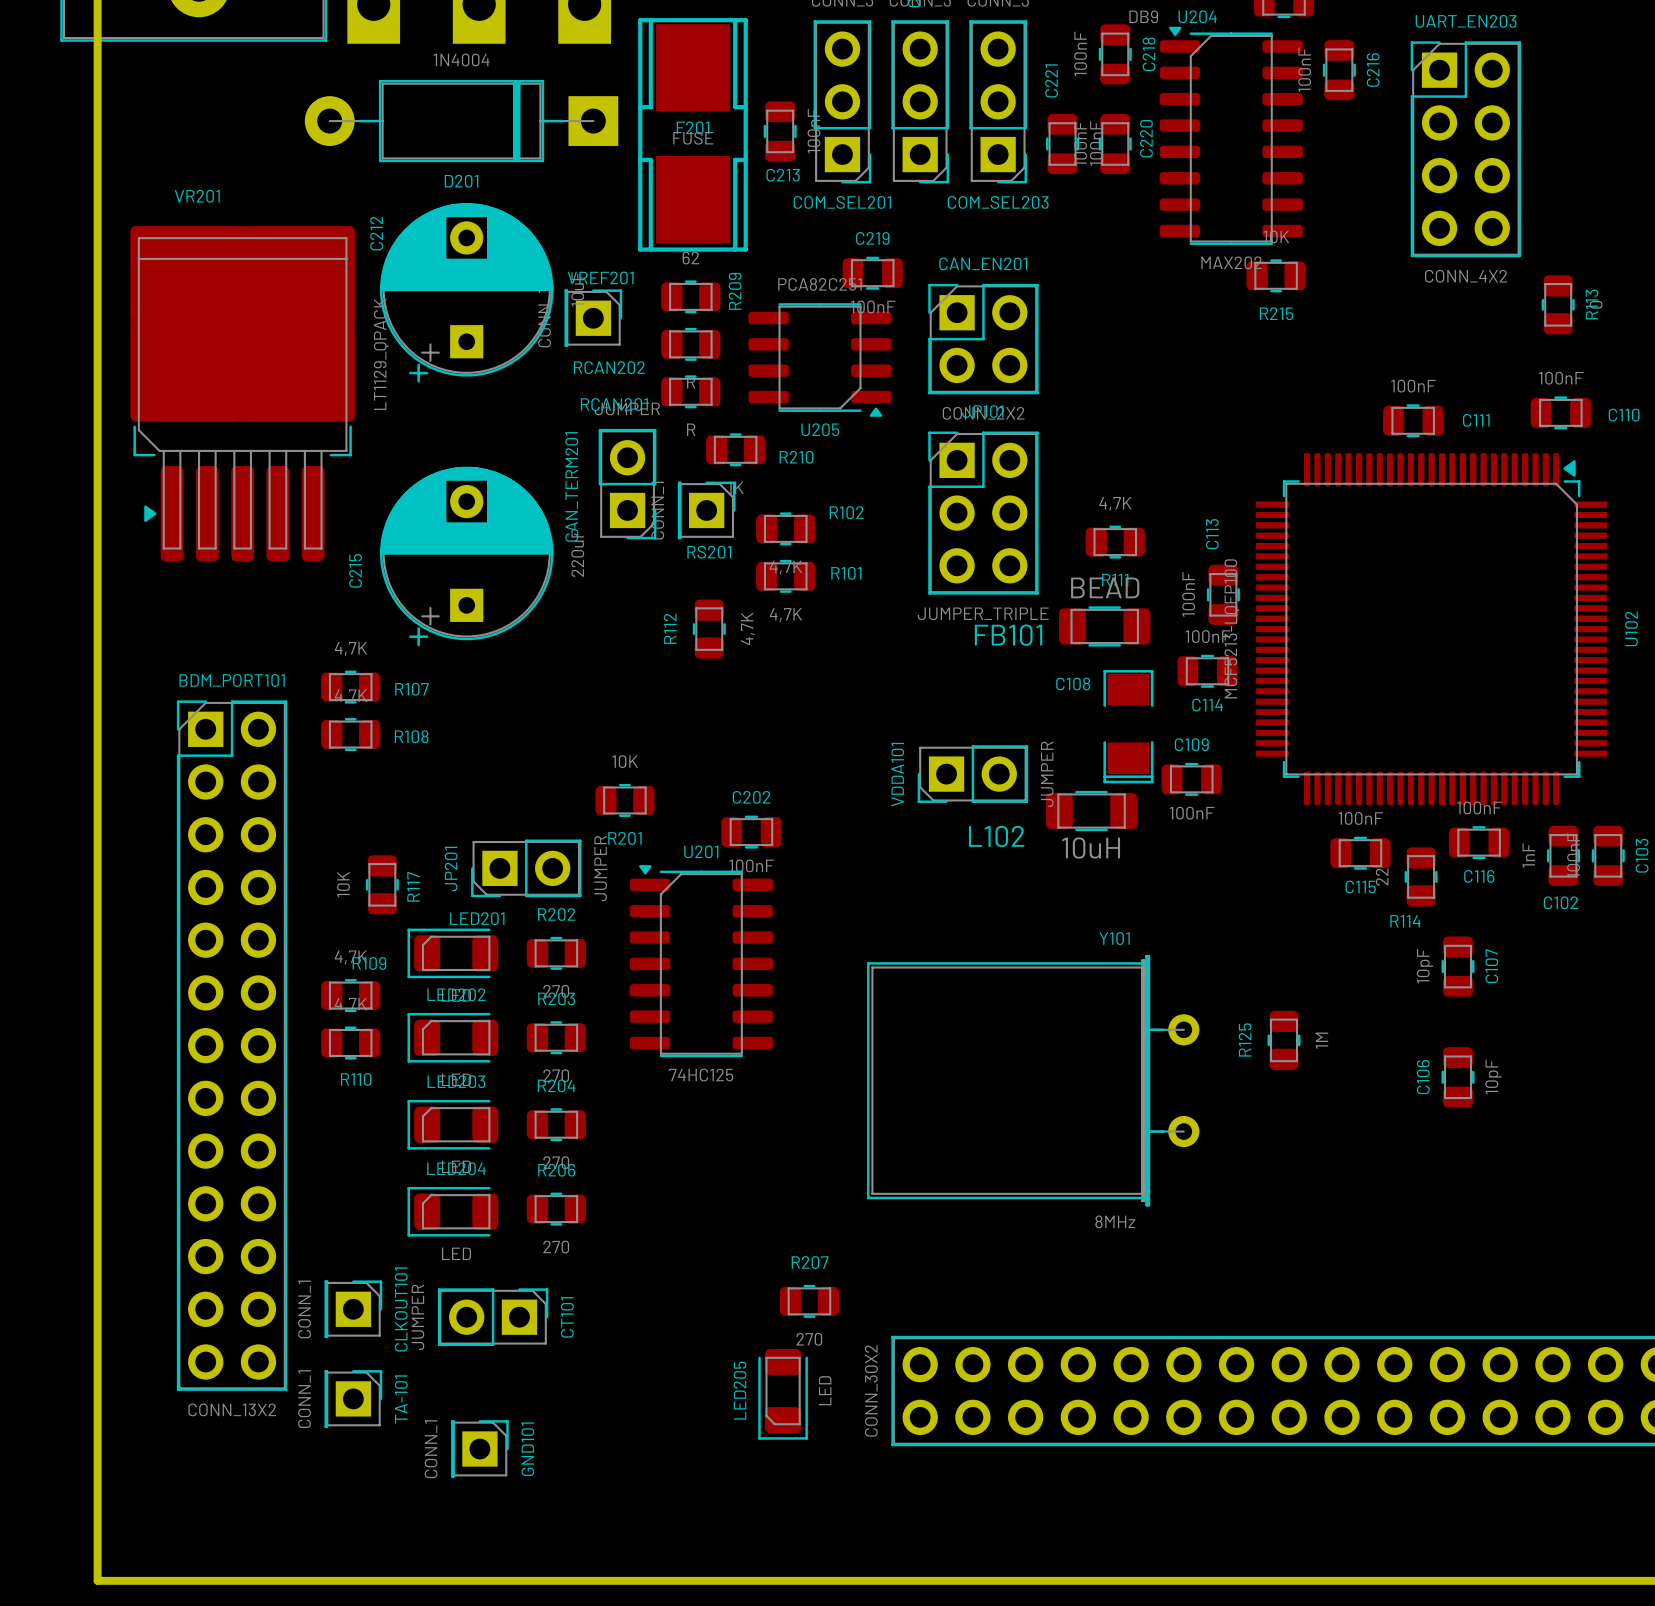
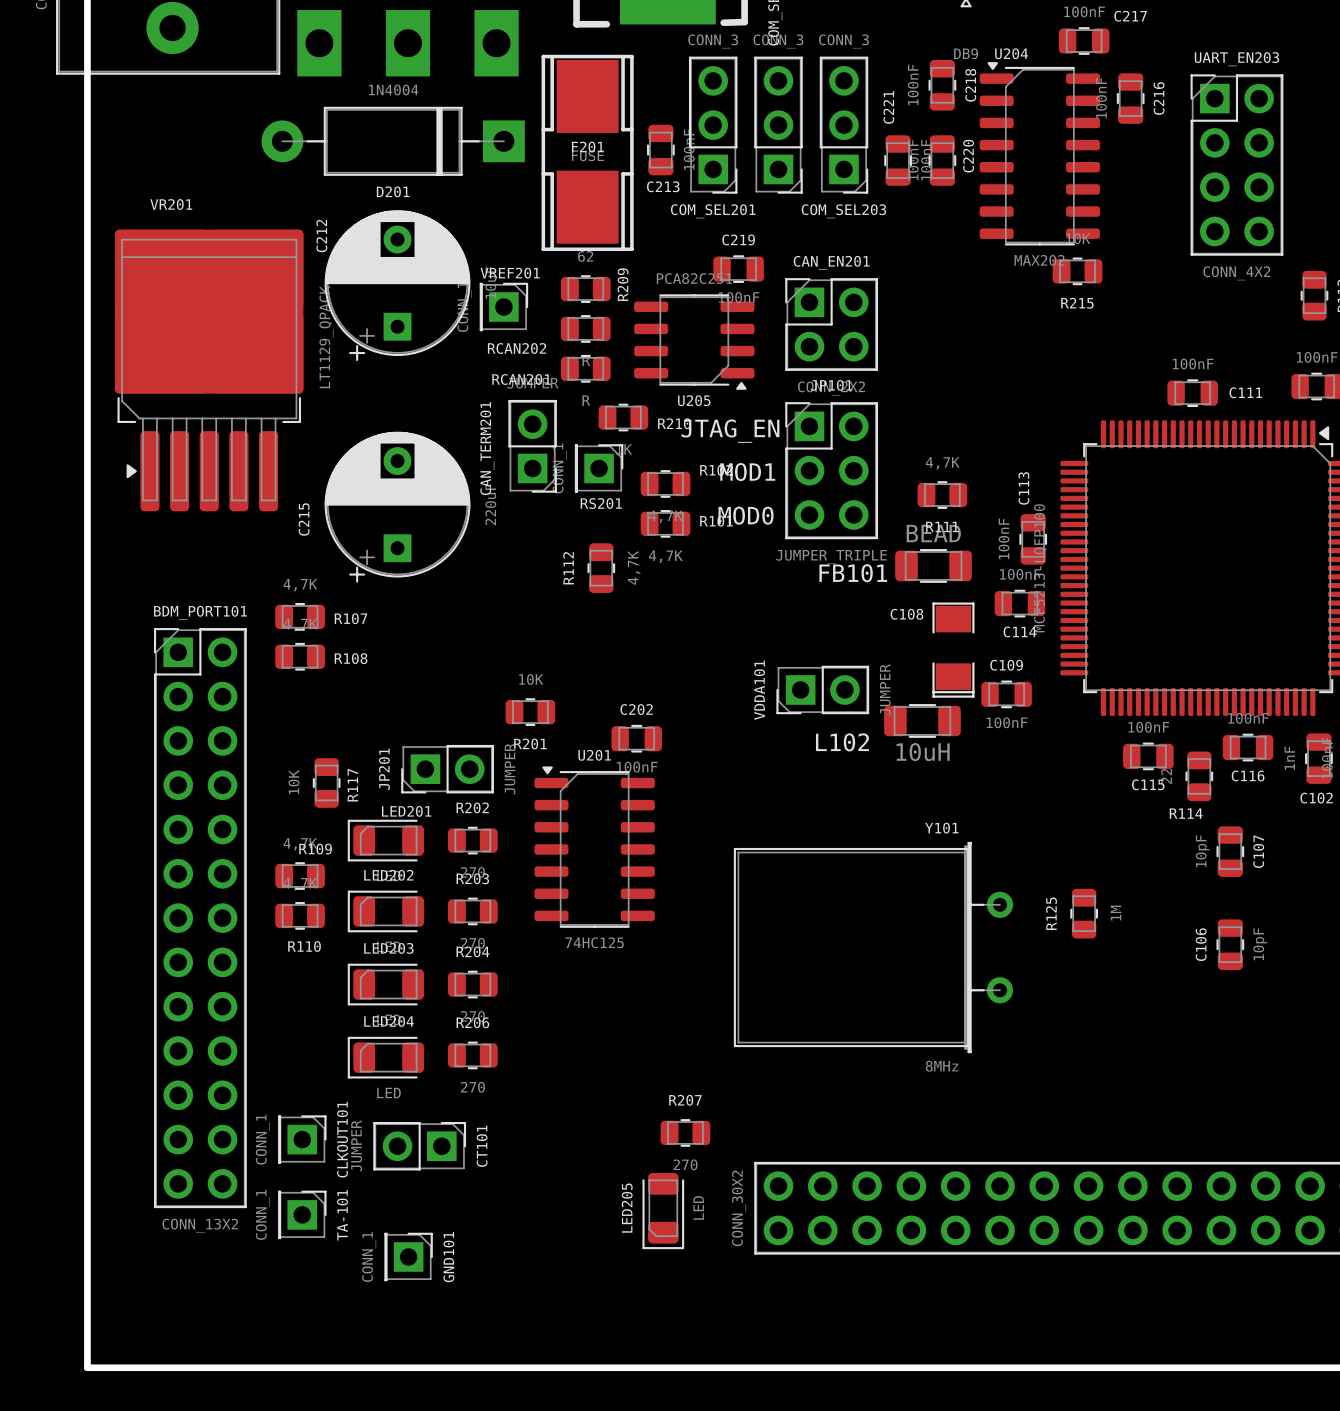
text: none -> JTAG_EN (730, 431)
text: none -> MOD1 (747, 472)
text: none -> MOD0 (746, 515)

